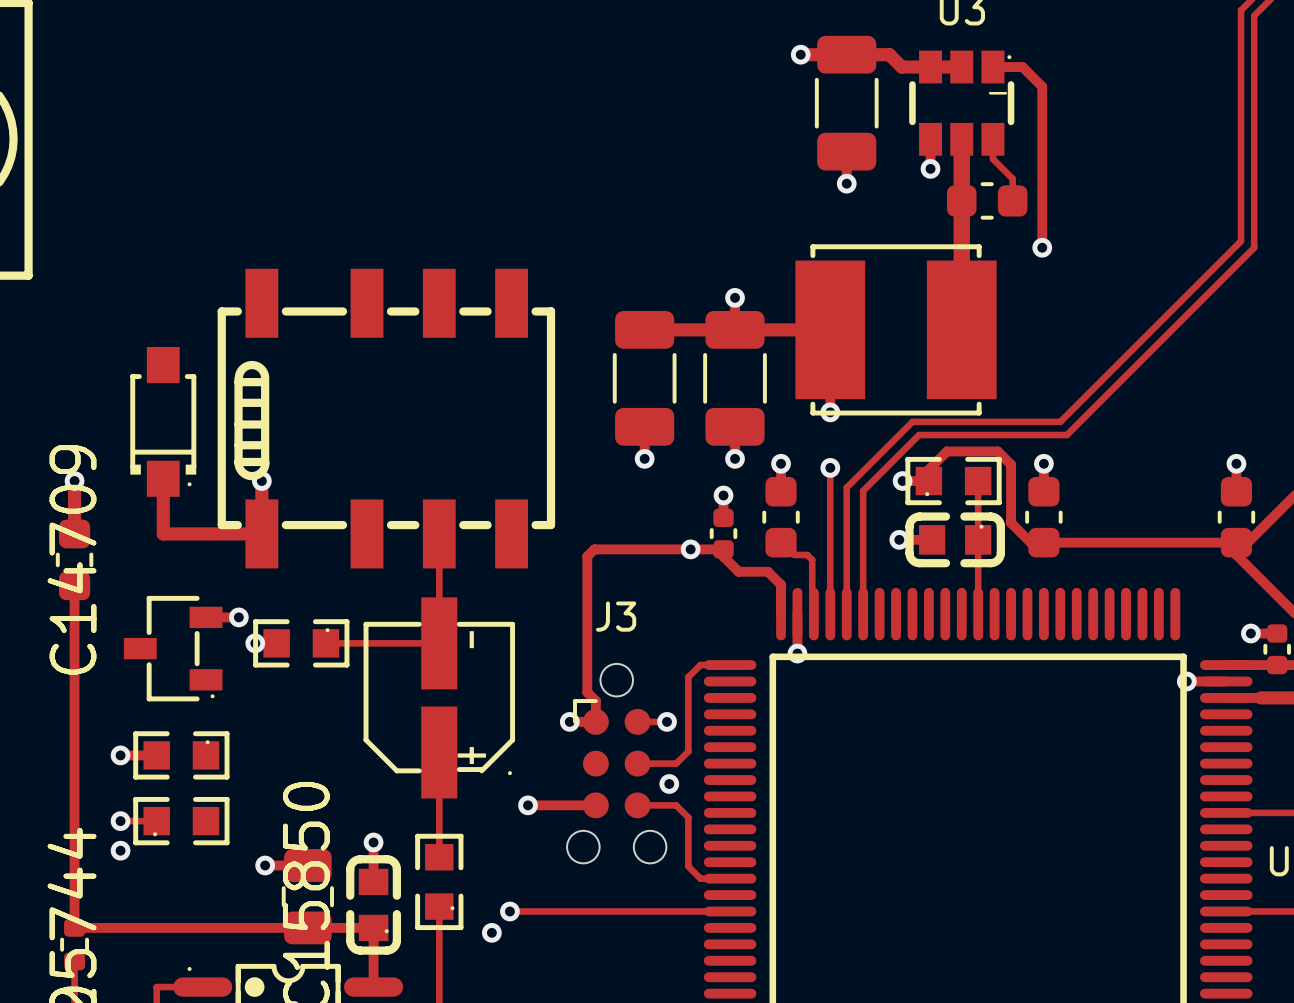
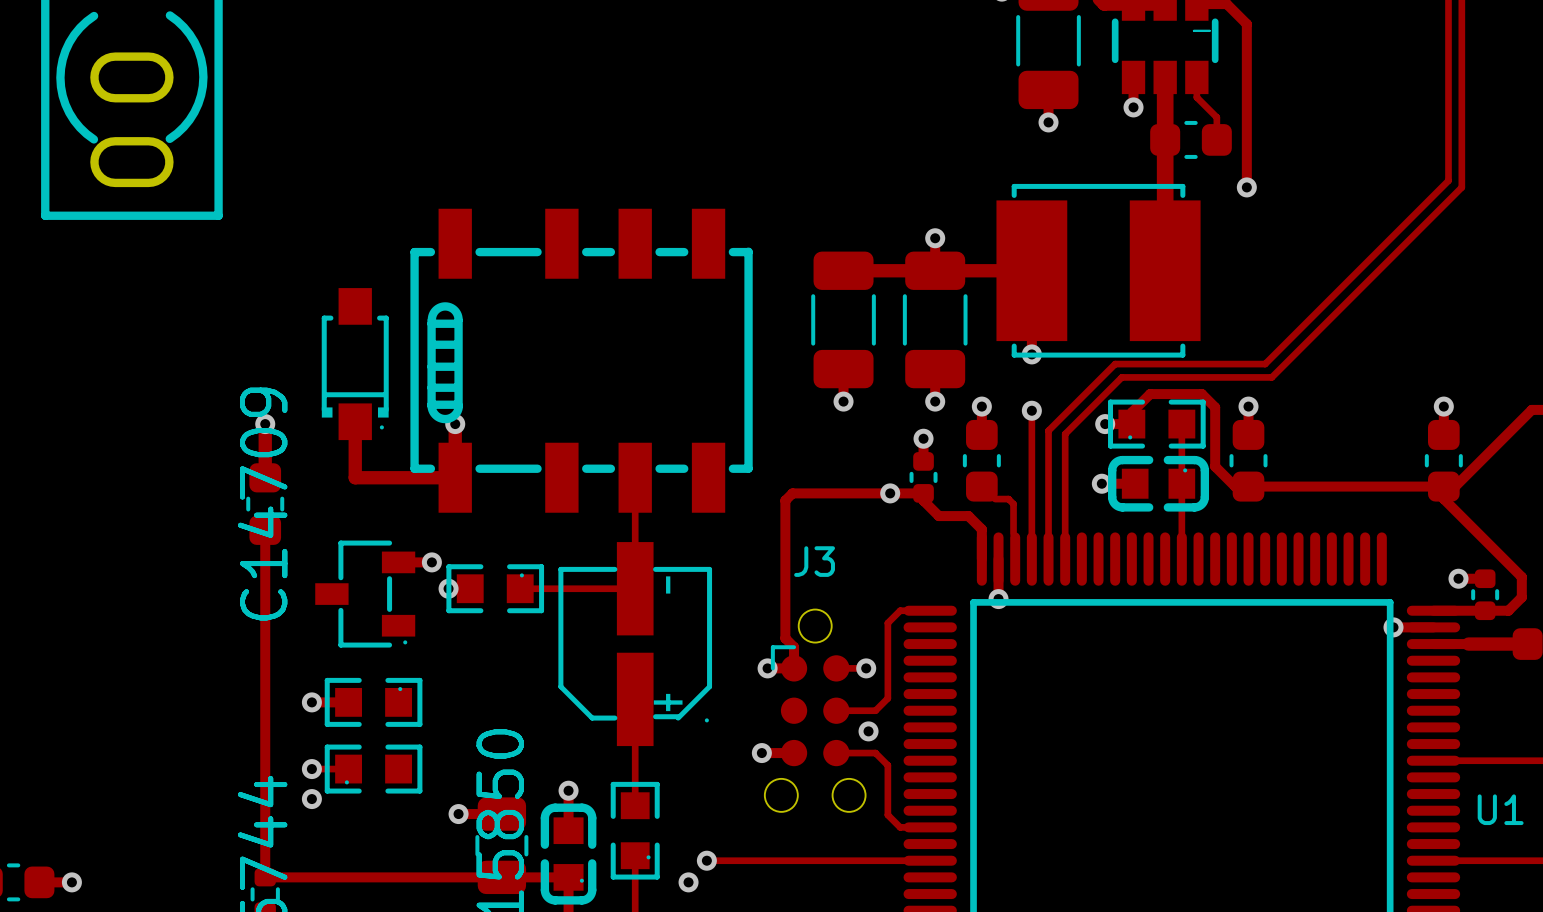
track: (528, 805) (564, 805) -> none
via position: (528, 805) -> (761, 753)

